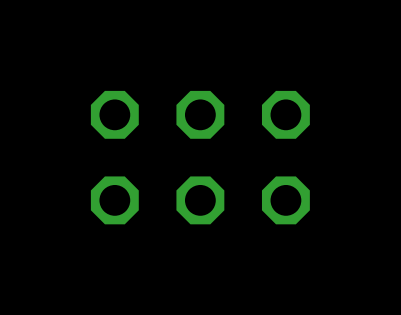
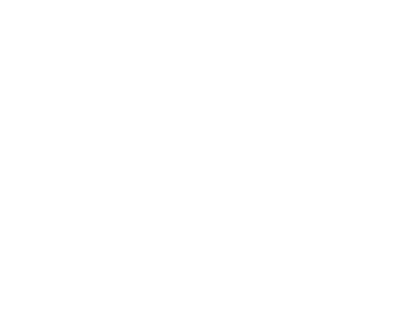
part: (200, 157) -> none

